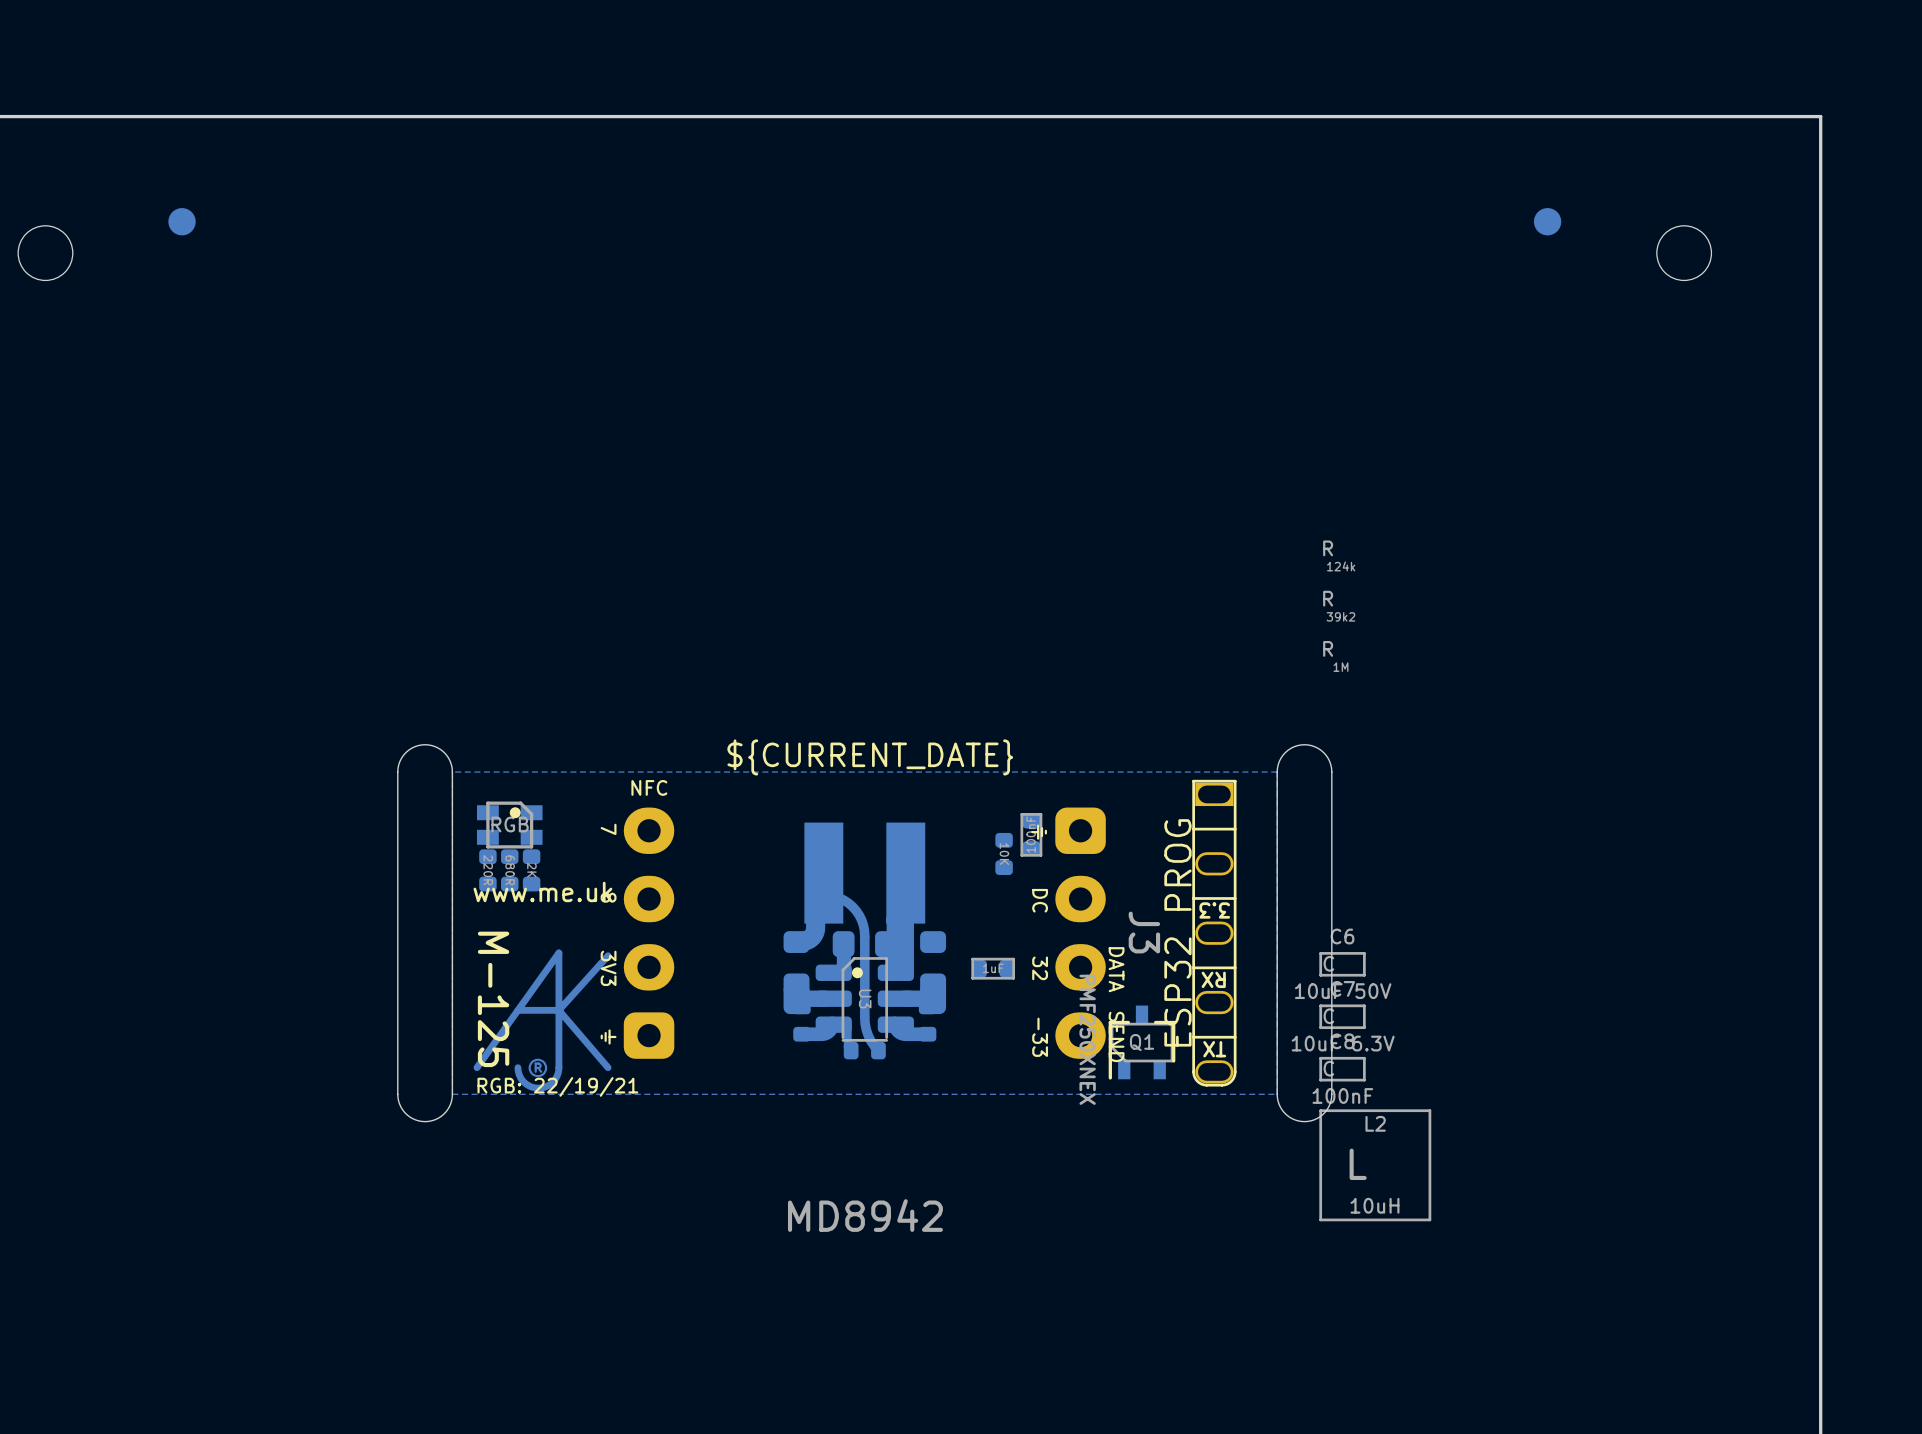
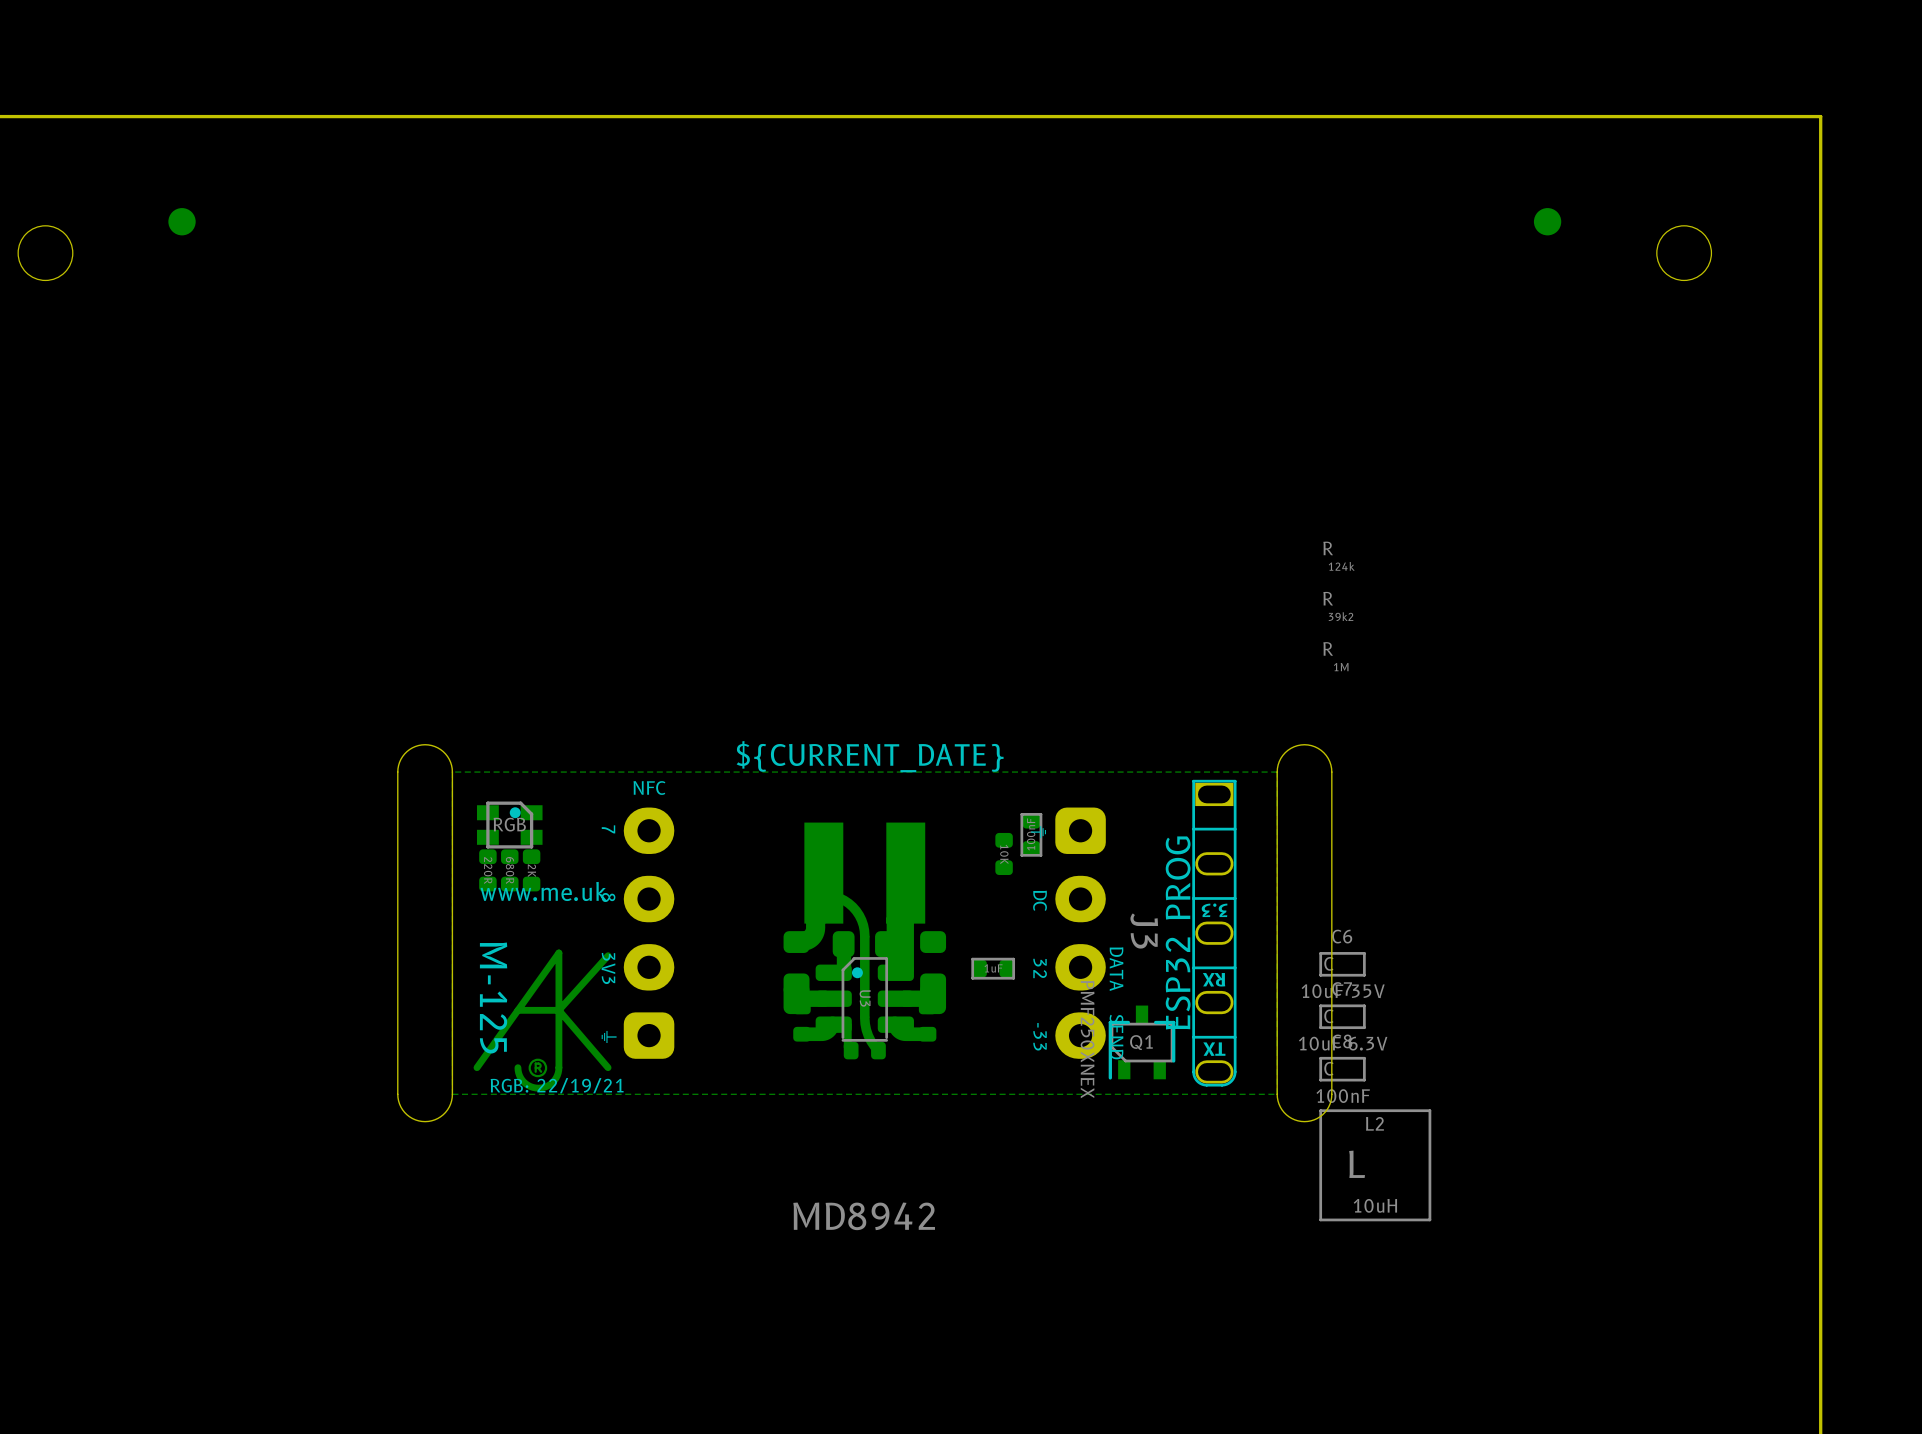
C6 value: 10uF 50V (1343, 991) -> 10uF 35V (1343, 991)

